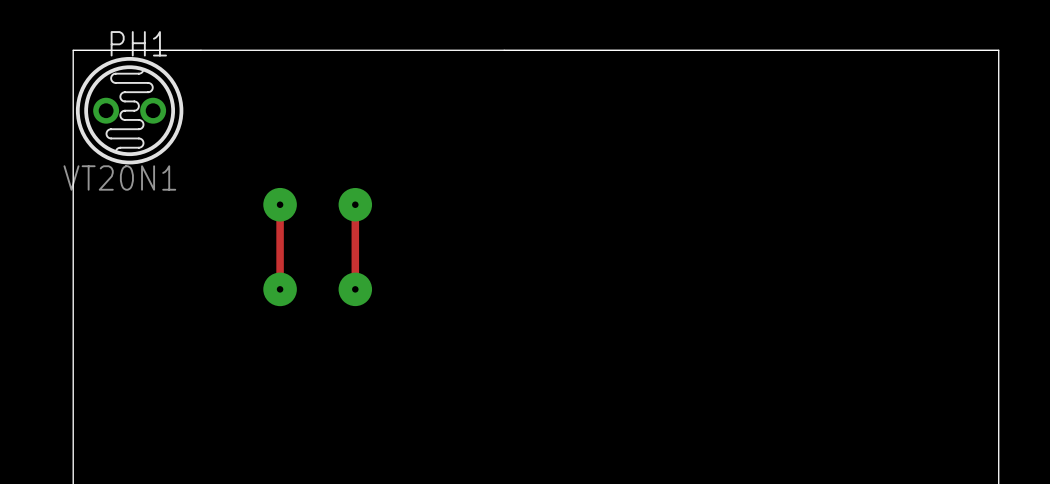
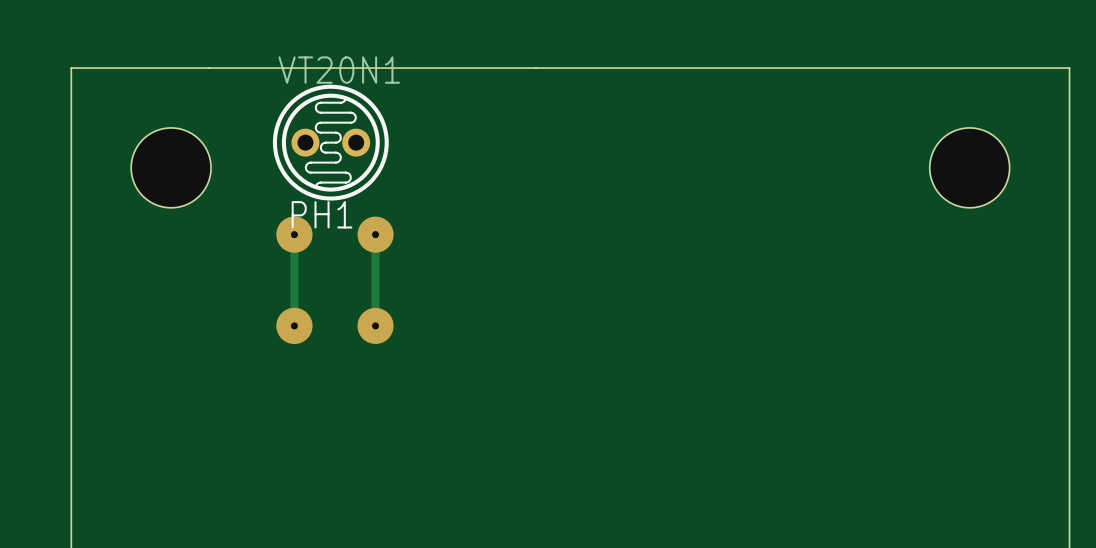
PH1 rotation: 0° (129, 110) -> 180° (330, 142)
PH1 position: (129, 110) -> (330, 142)
hole: none -> (171, 167)
hole: none -> (969, 167)

